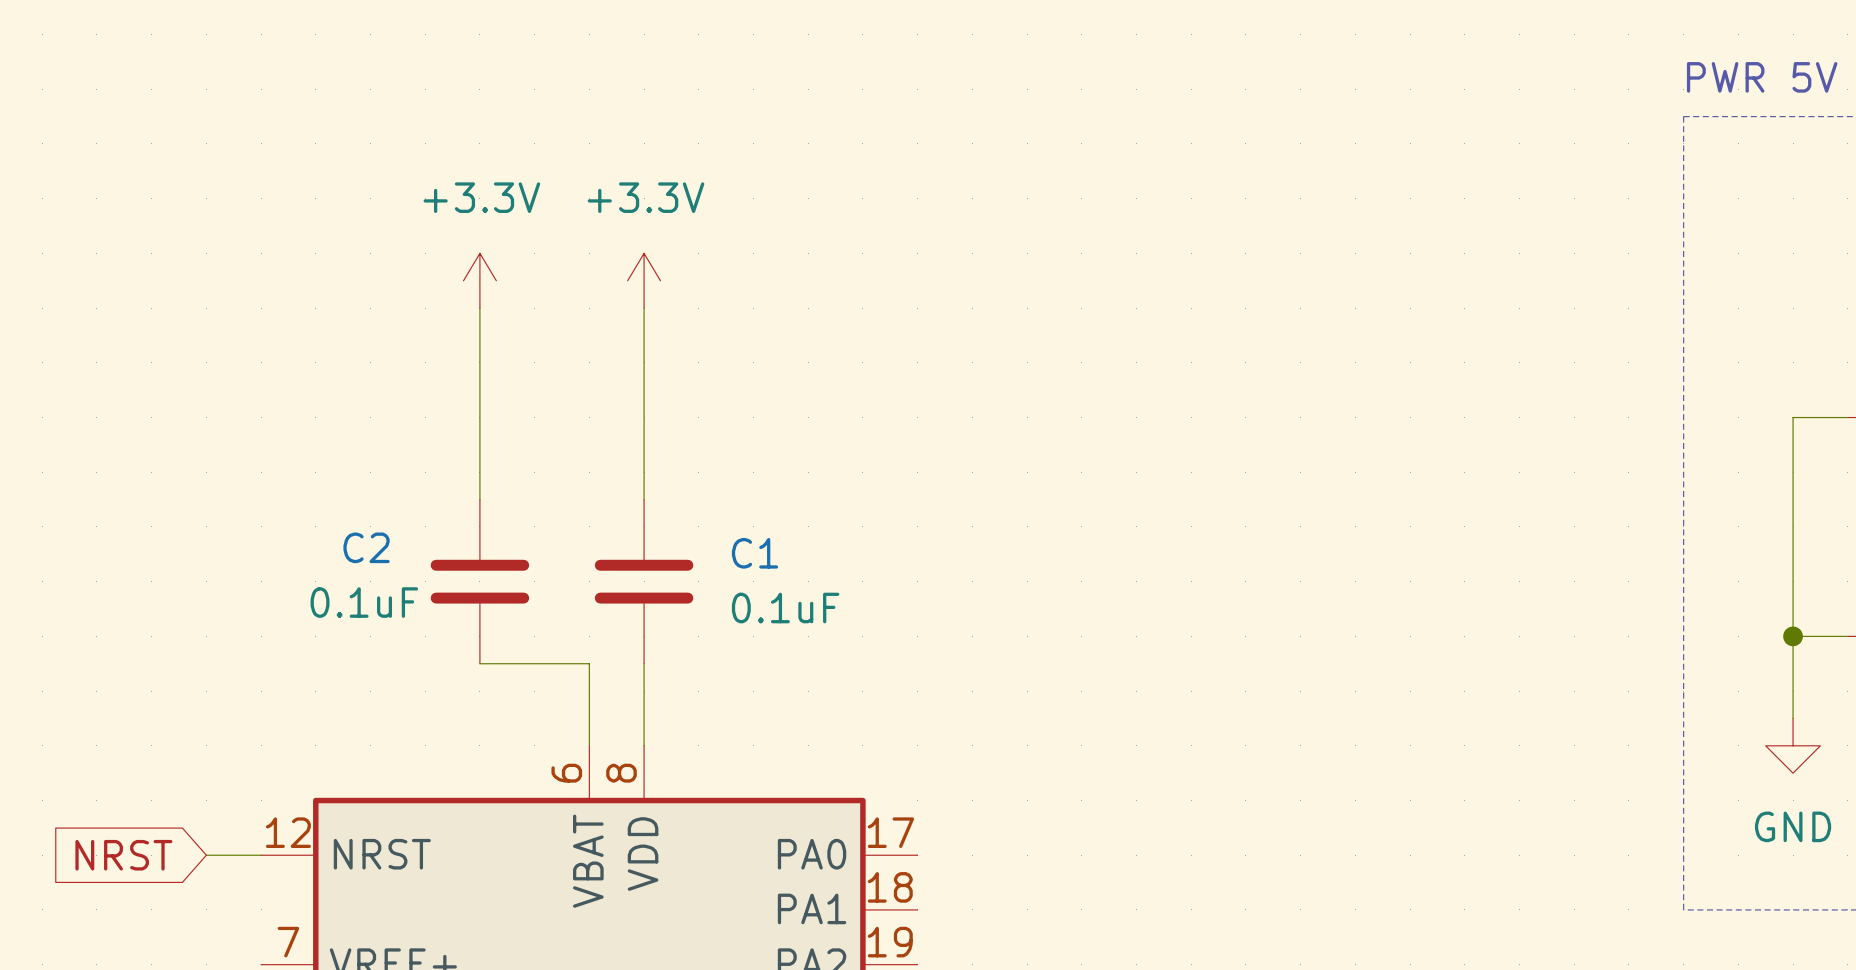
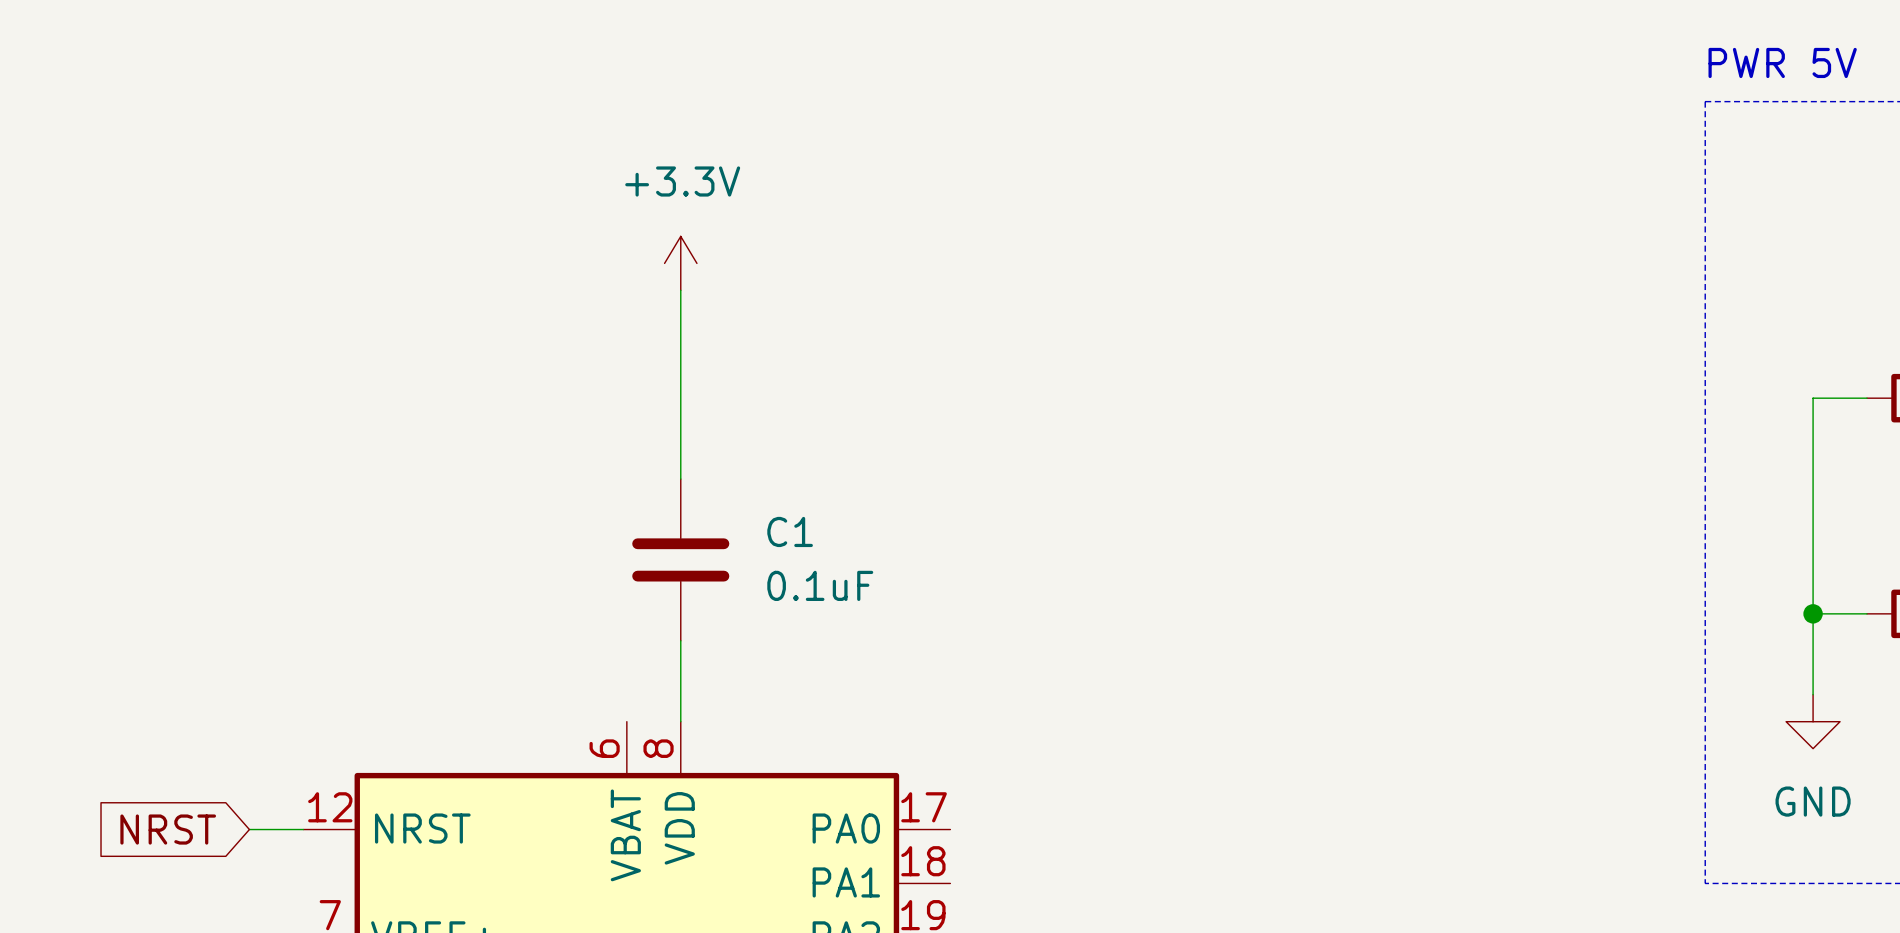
power symbol: +3.3V (479, 280) -> none
wire: (479, 308) (479, 499) -> none
C2: 0.1uF (479, 581) -> none
wire: (479, 663) (589, 663) (589, 745) -> none

